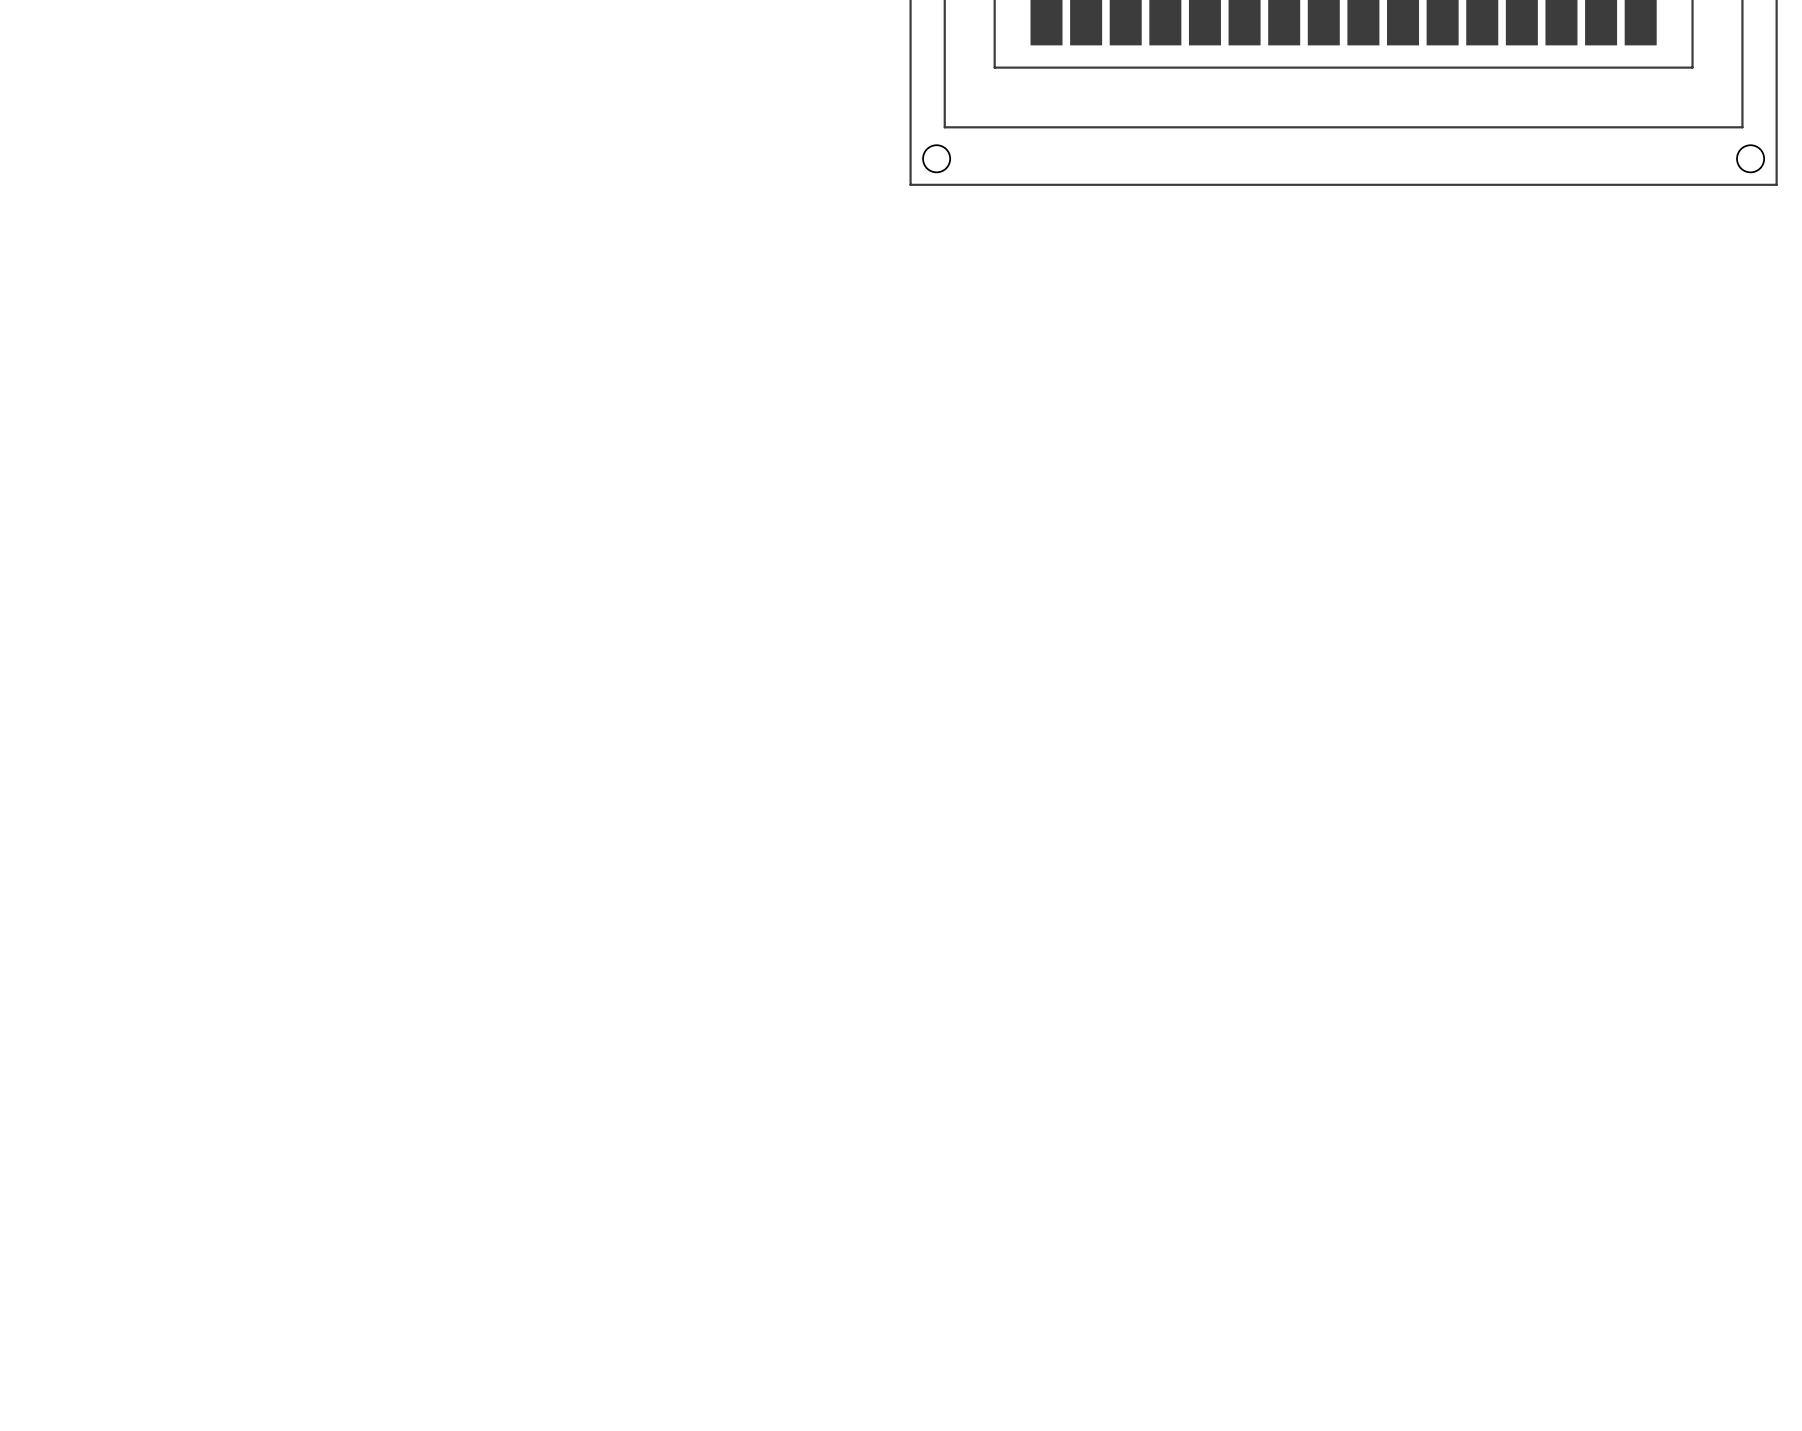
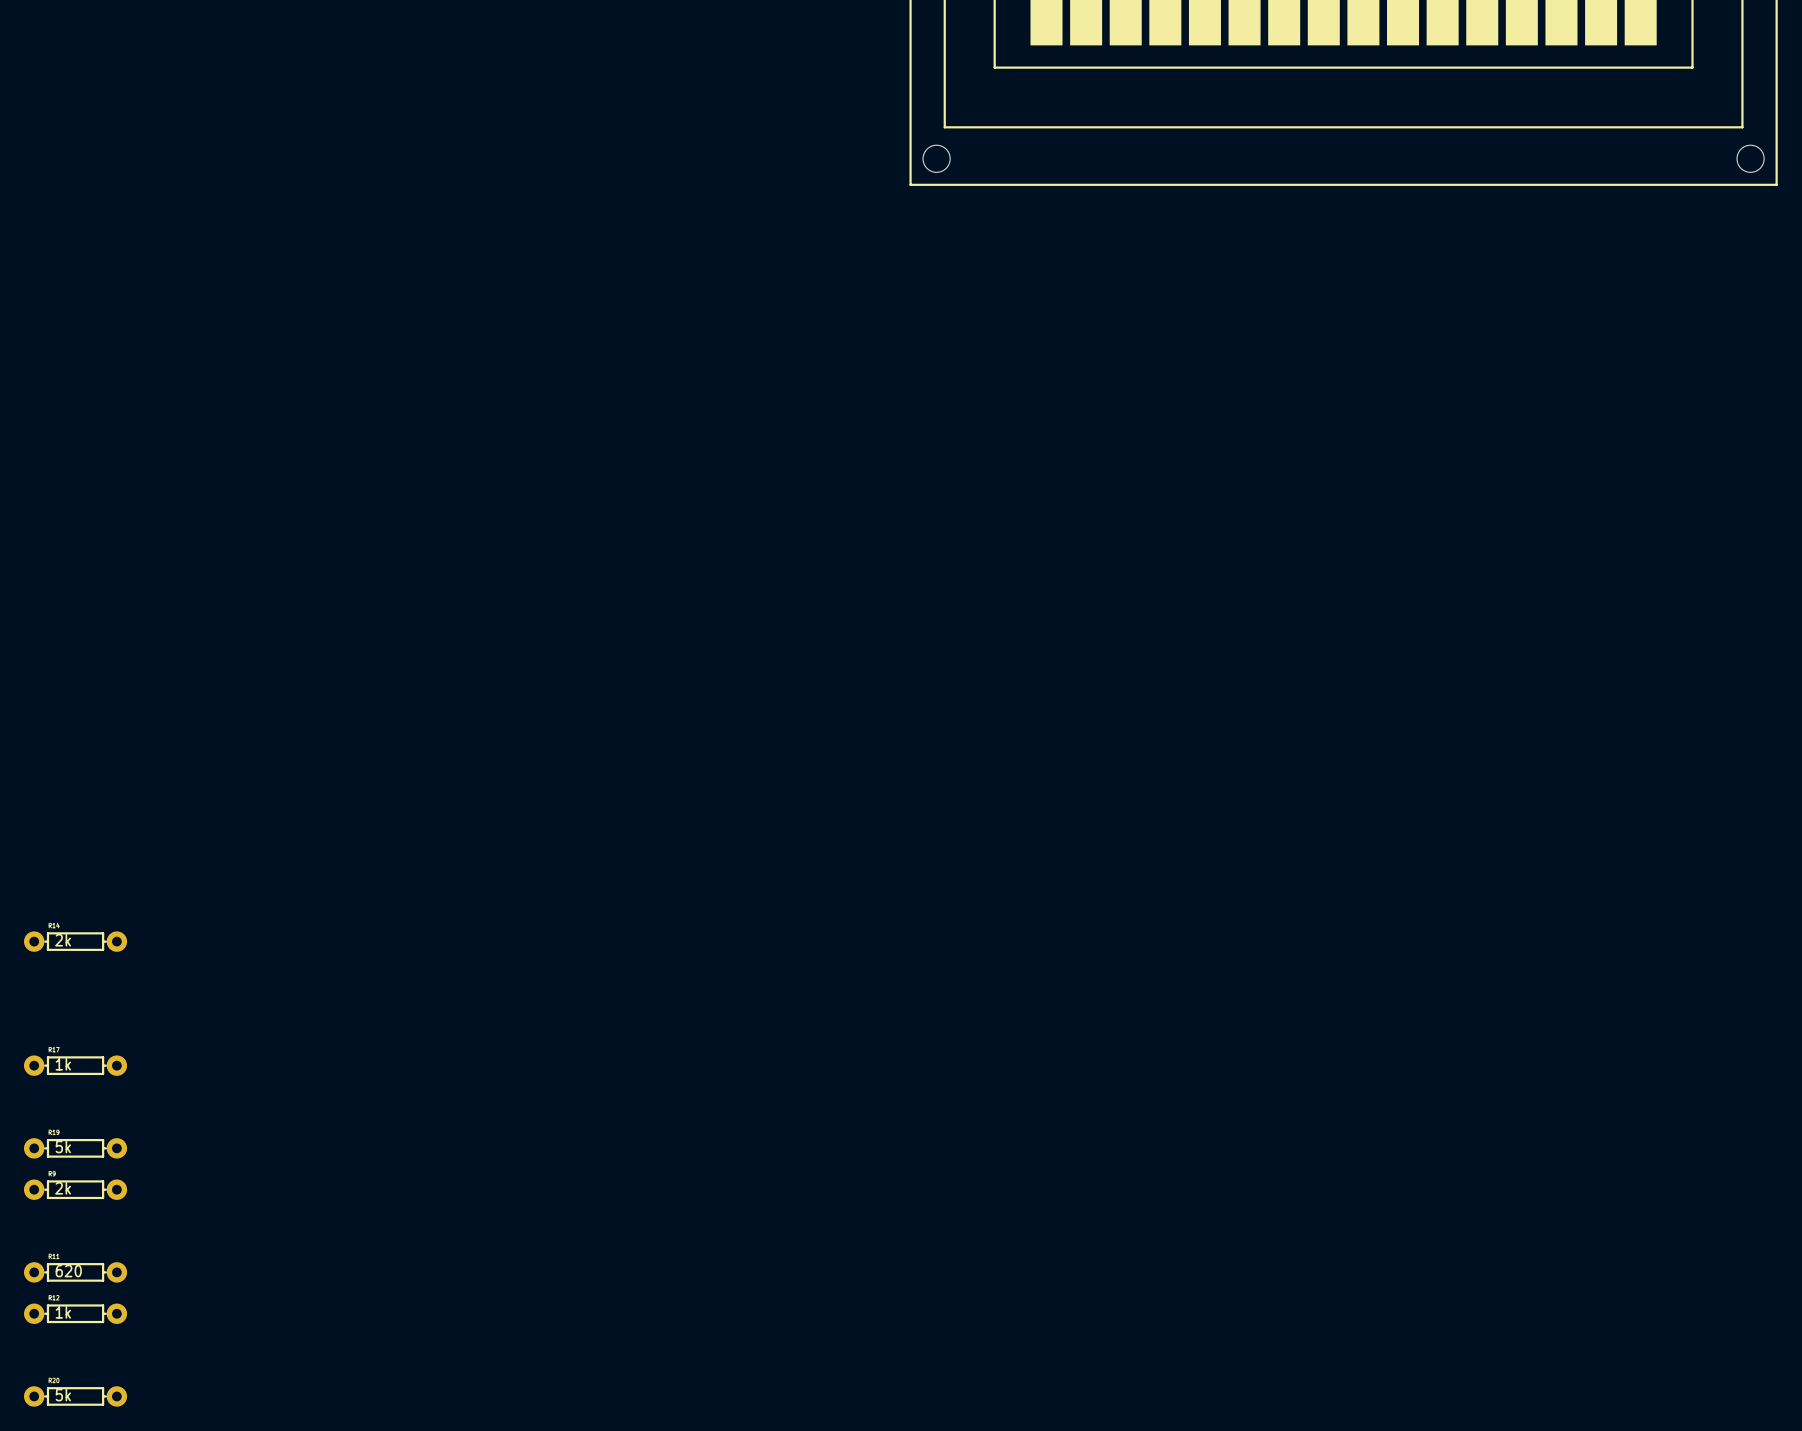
part: none -> 2k (75, 941)
part: none -> 1k (75, 1065)
part: none -> 5k (75, 1148)
part: none -> 2k (75, 1189)
part: none -> 620 (75, 1272)
part: none -> 1k (75, 1313)
part: none -> 5k (75, 1396)

